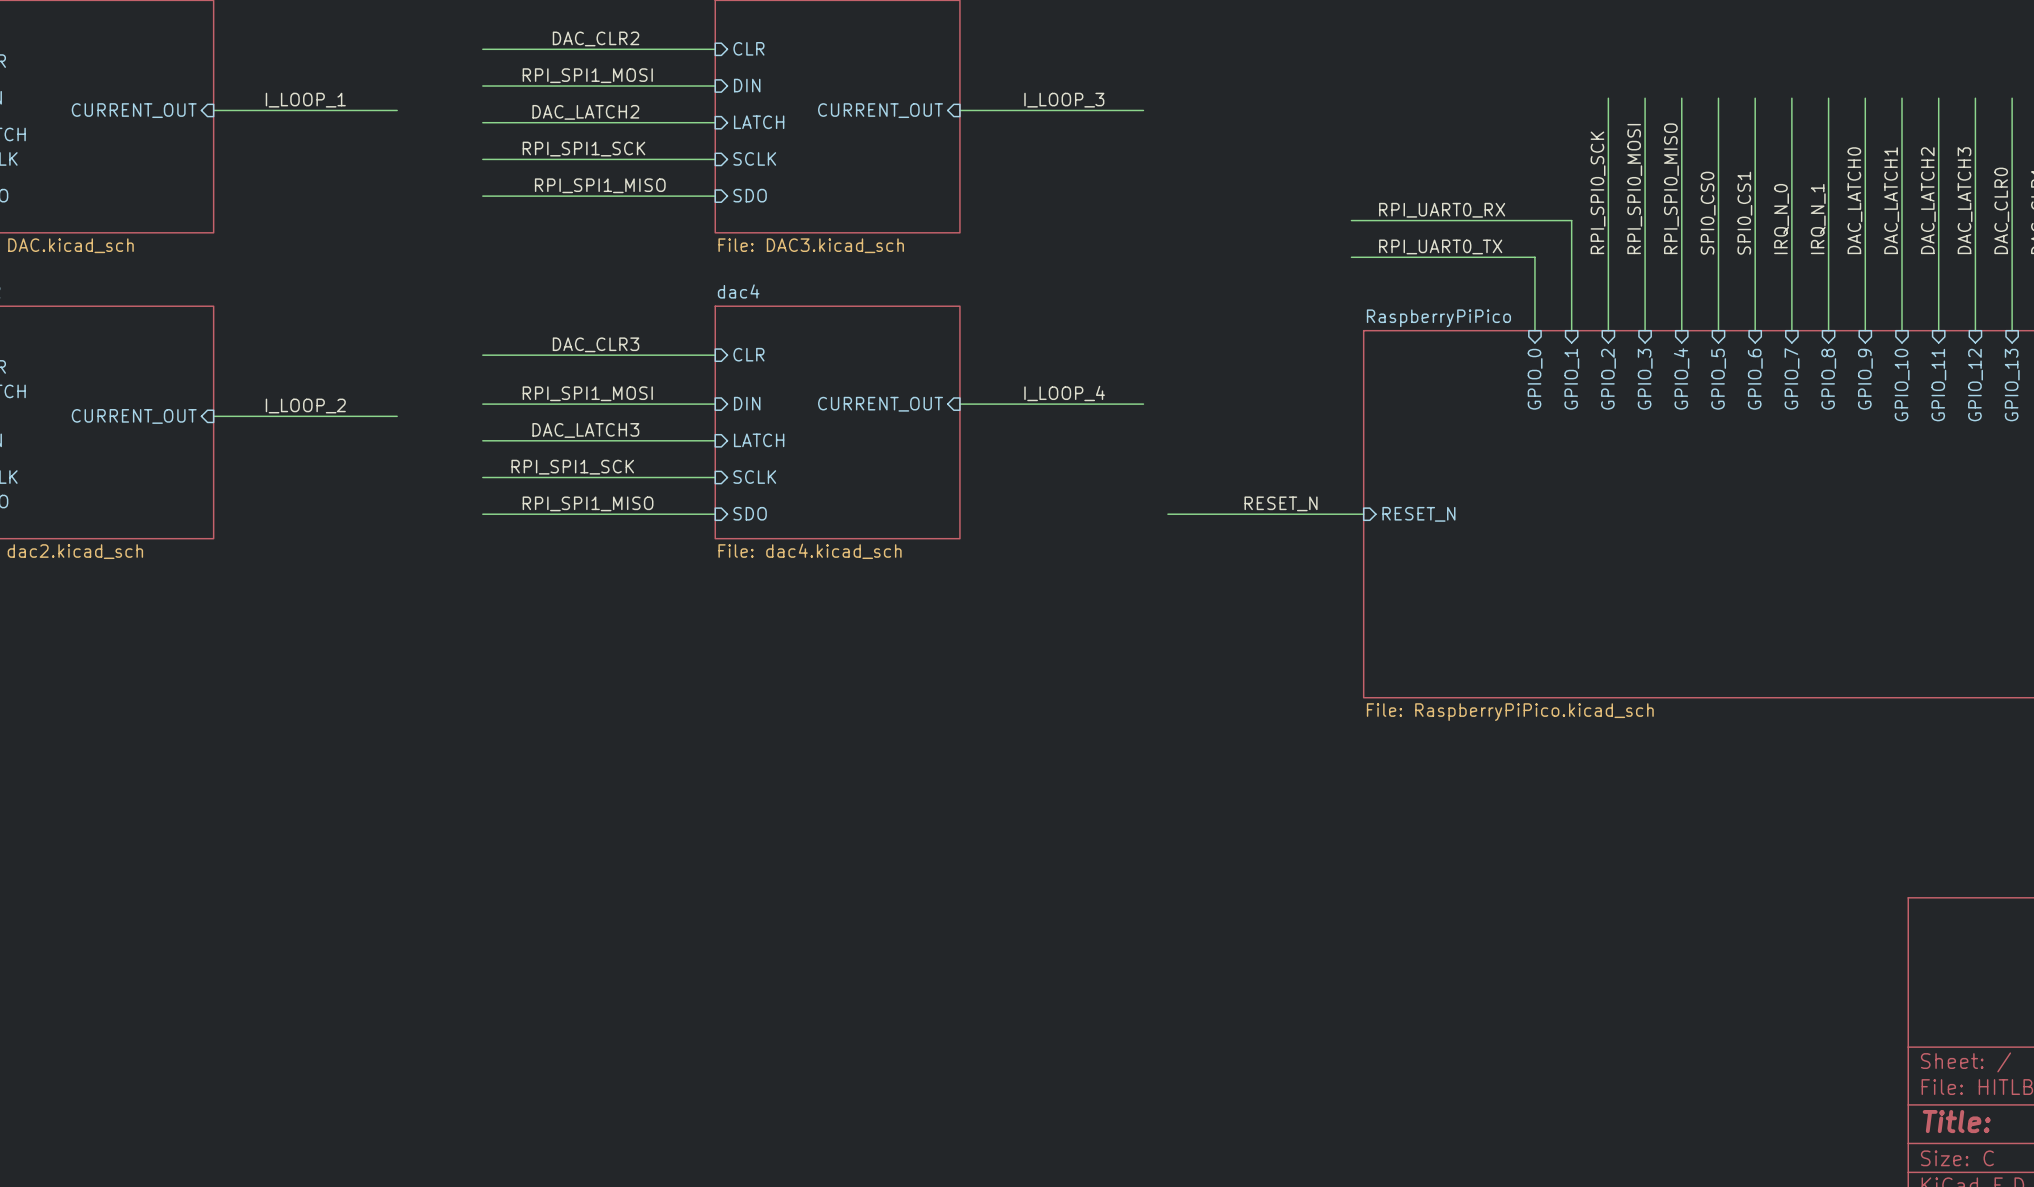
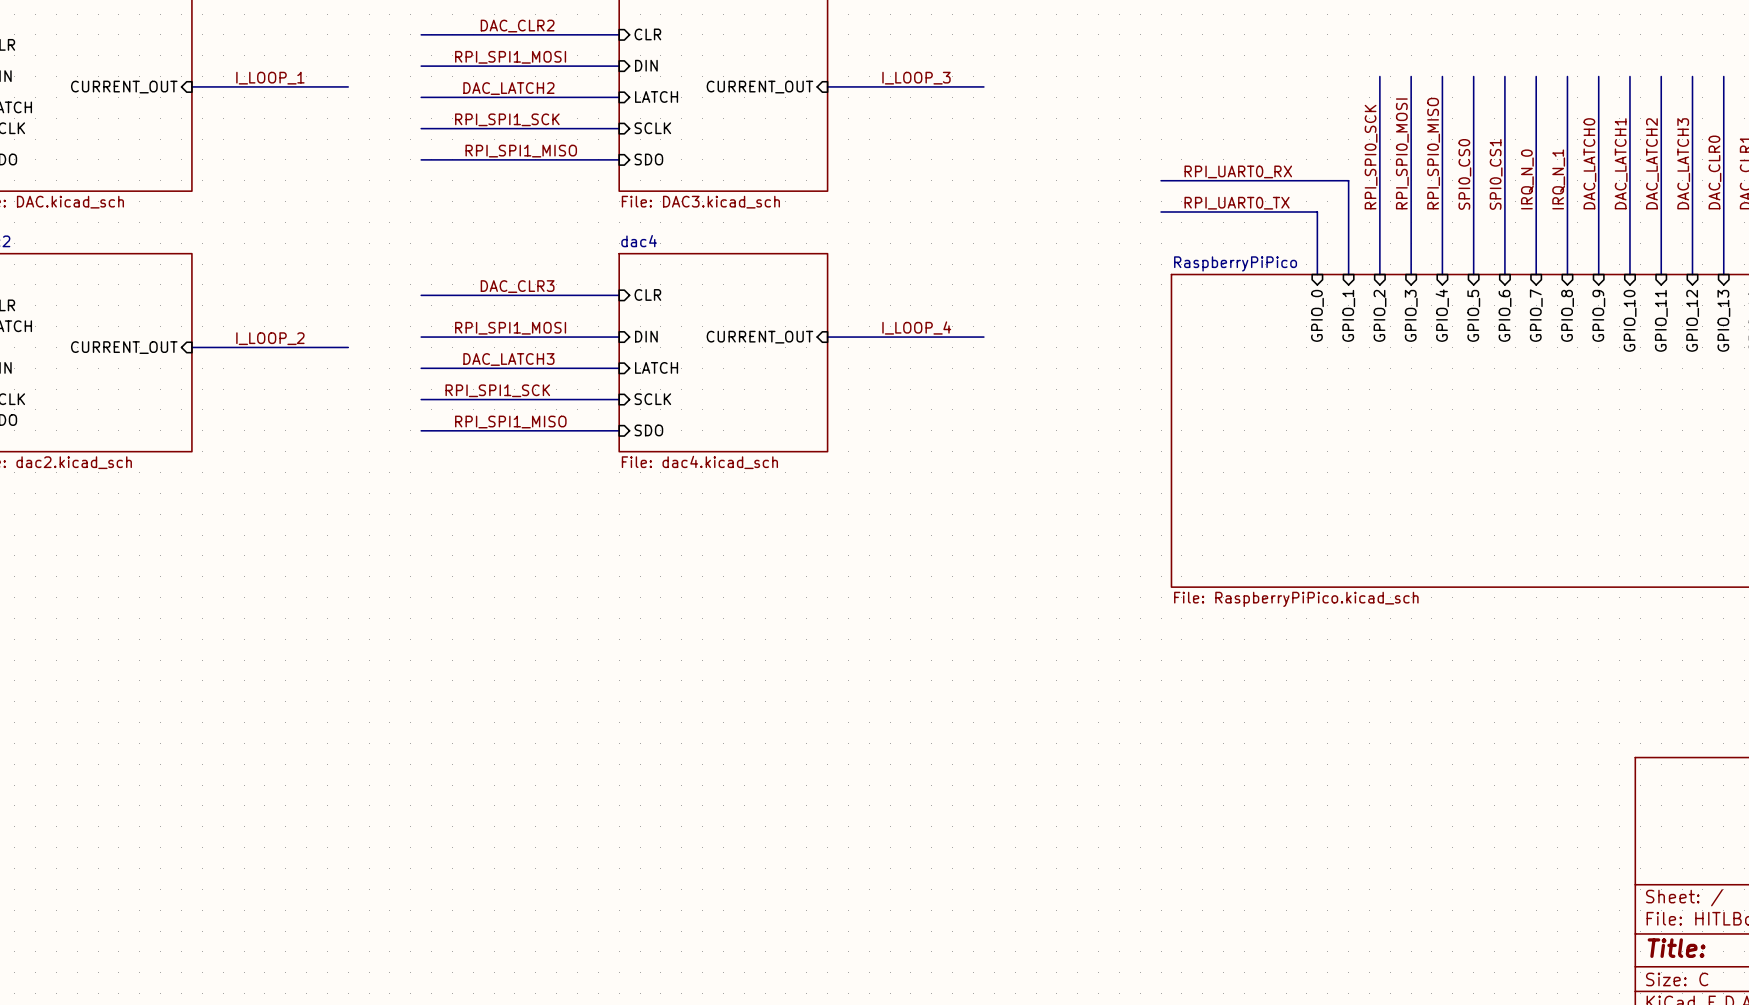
label: RESET_N (1281, 503) -> none
wire: (1167, 514) (1363, 514) -> none
sheet pin: RESET_N (1418, 514) -> none

